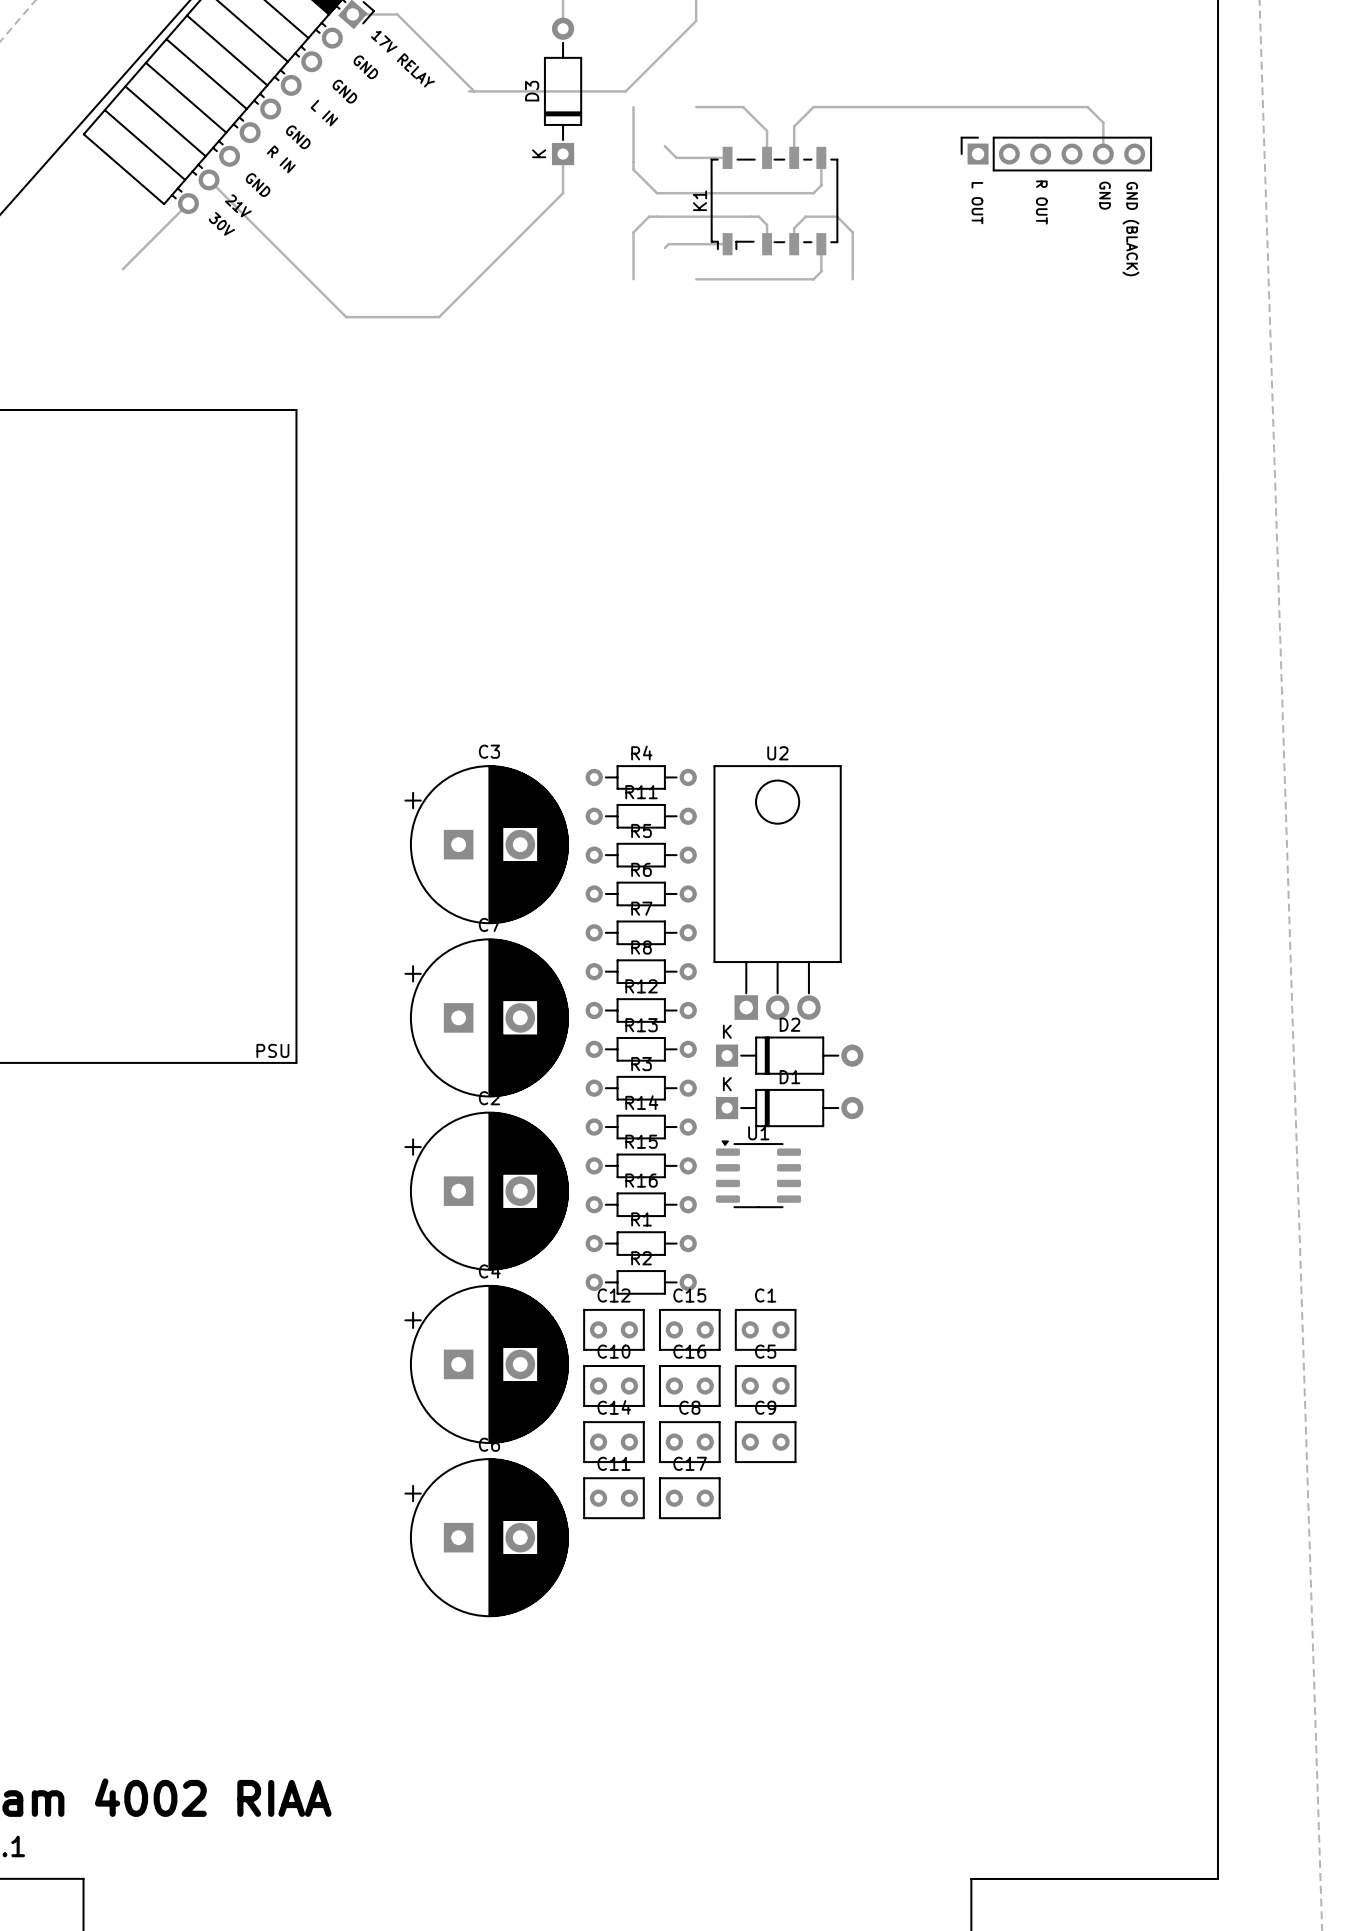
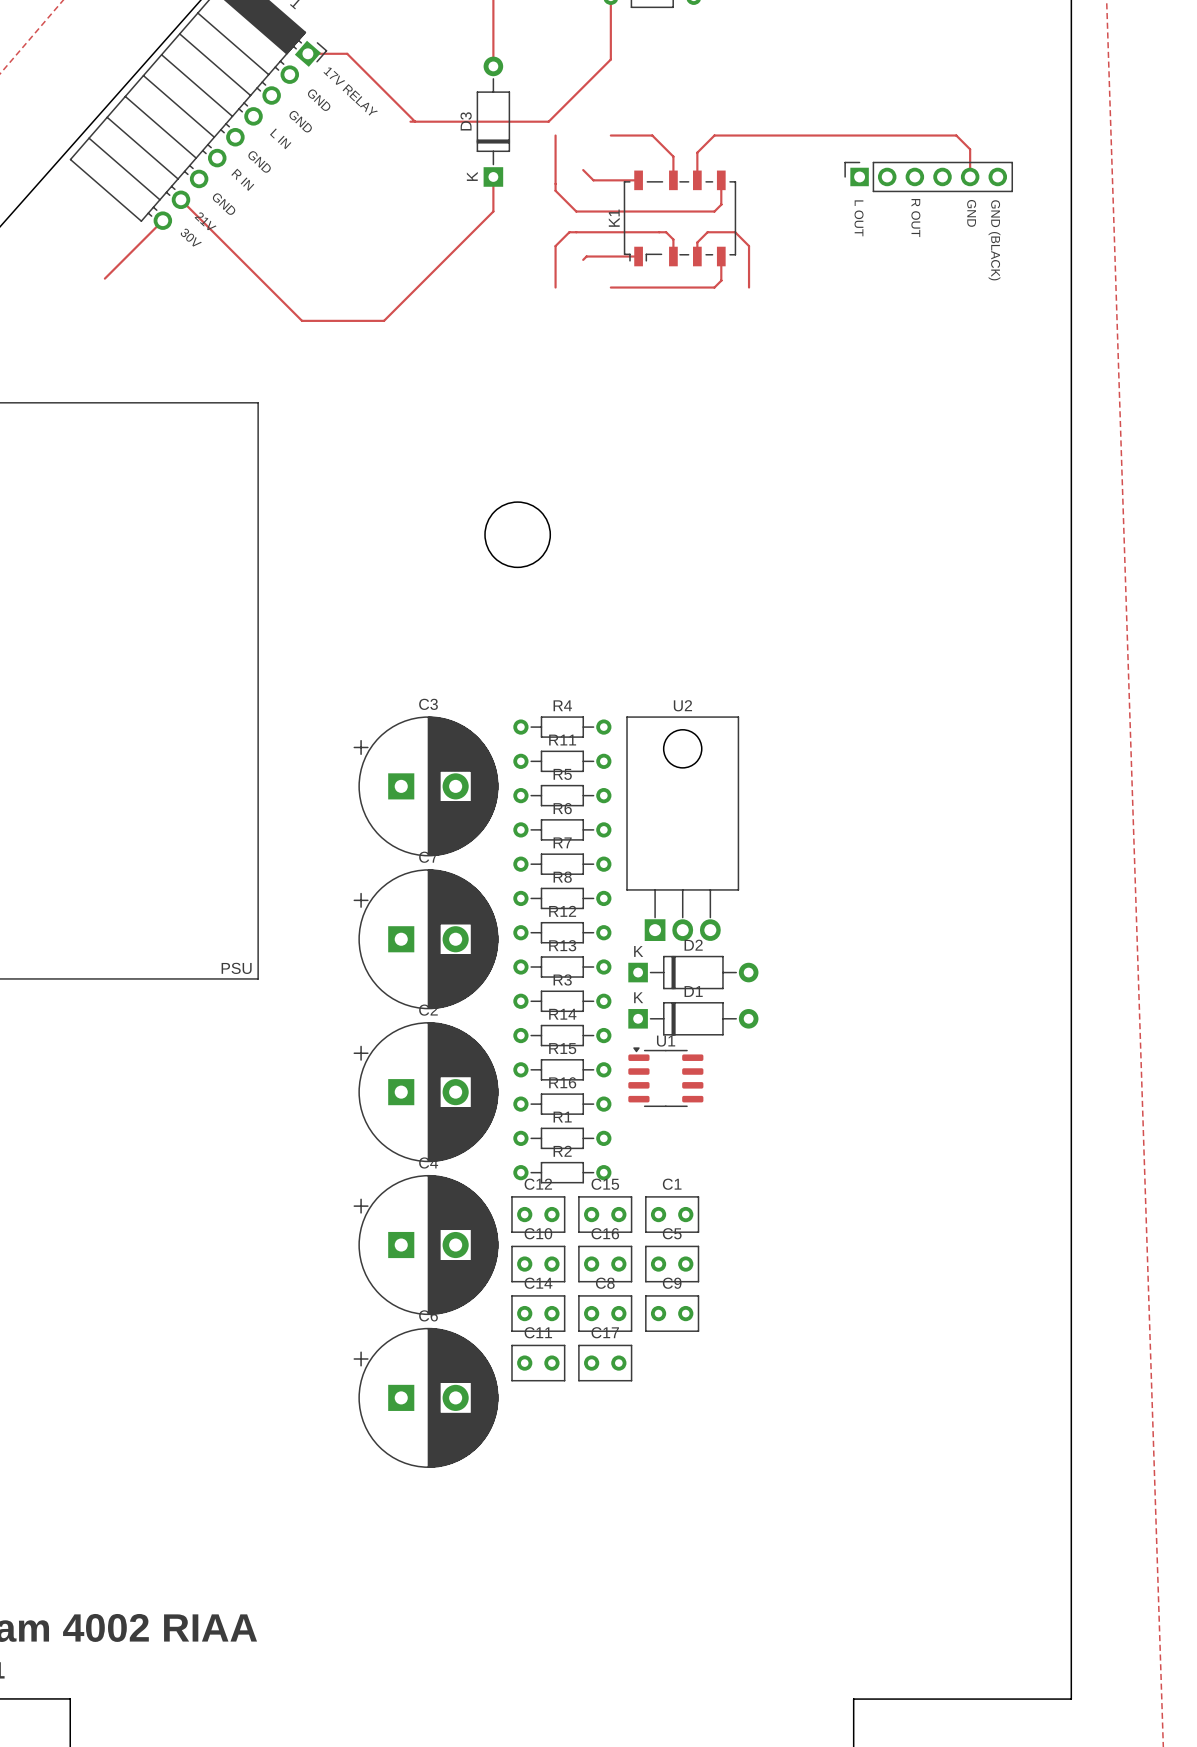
round board edge: none -> [484, 501, 551, 568]

